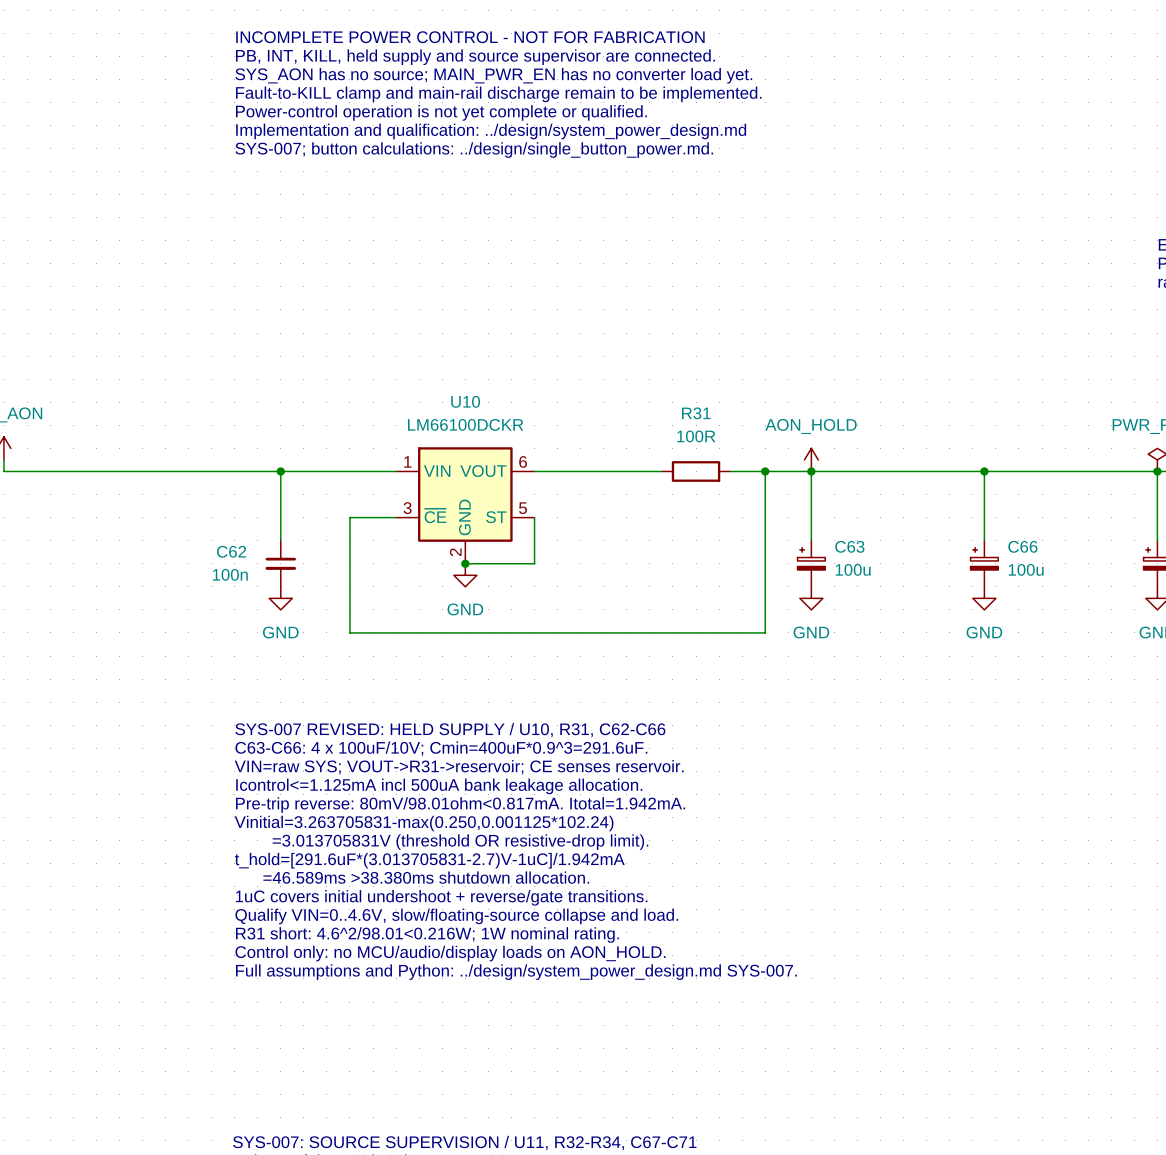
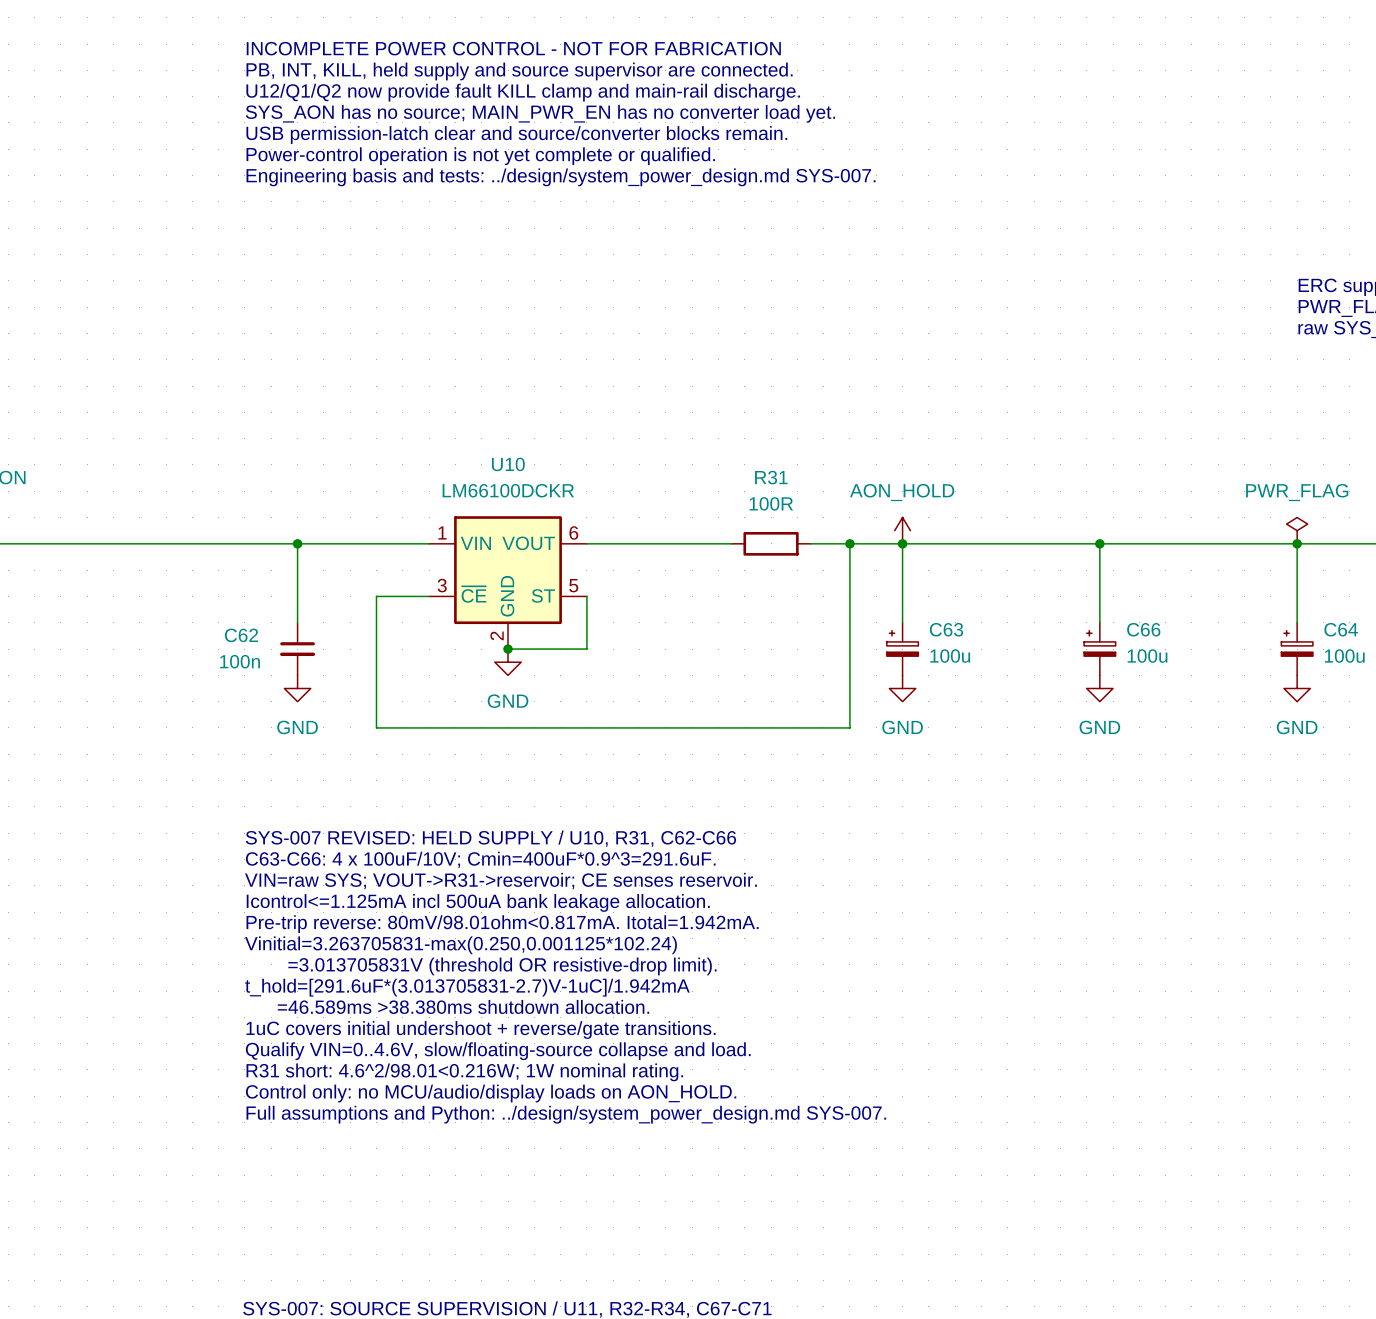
text: SYS_AON has no source; MAIN_PWR_EN has no converter load yet. (493, 75) -> U12/Q1/Q2 now provide fault KILL clamp and main-rail discharge. (523, 92)
text: Fault-to-KILL clamp and main-rail discharge remain to be implemented. (498, 94) -> SYS_AON has no source; MAIN_PWR_EN has no converter load yet. (540, 113)
text: Power-control operation is not yet complete or qualified. (441, 112) -> USB permission-latch clear and source/converter blocks remain. (516, 134)
text: Implementation and qualification: ../design/system_power_design.md (491, 131) -> Power-control operation is not yet complete or qualified. (480, 156)
text: SYS-007; button calculations: ../design/single_button_power.md. (474, 150) -> Engineering basis and tests: ../design/system_power_design.md SYS-007. (561, 177)

